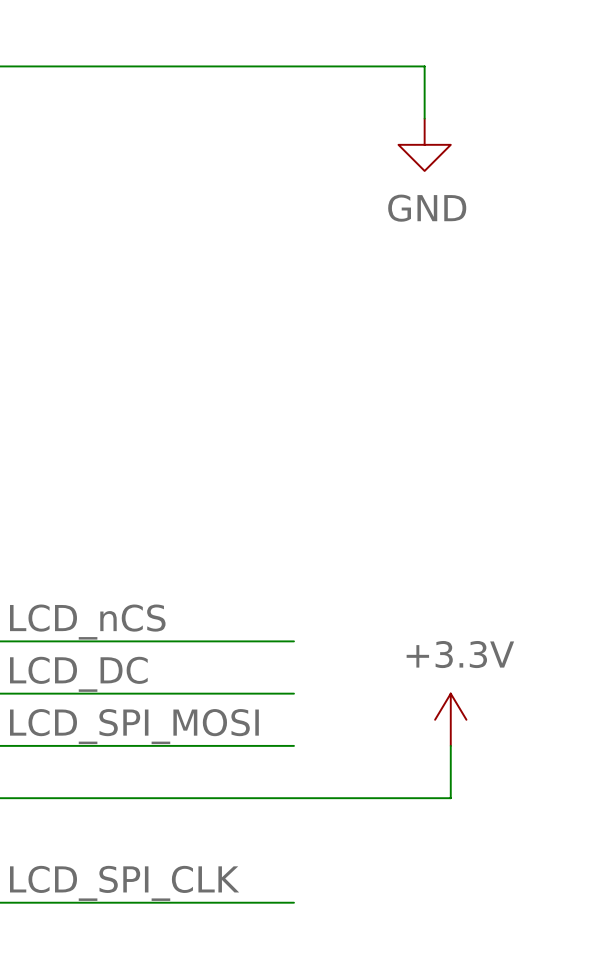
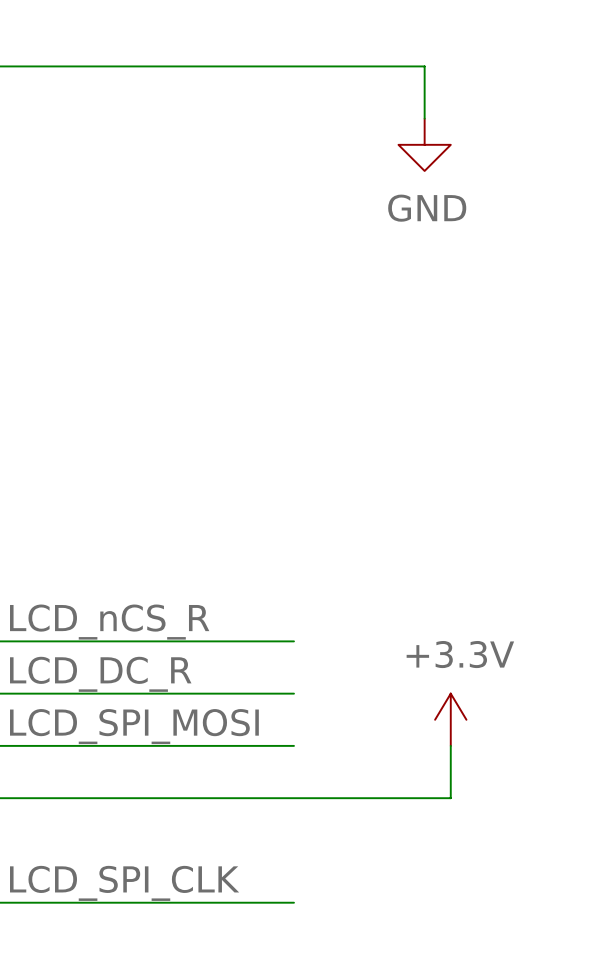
label: LCD_nCS (87, 622) -> LCD_nCS_R (109, 622)
label: LCD_DC (78, 674) -> LCD_DC_R (100, 674)

